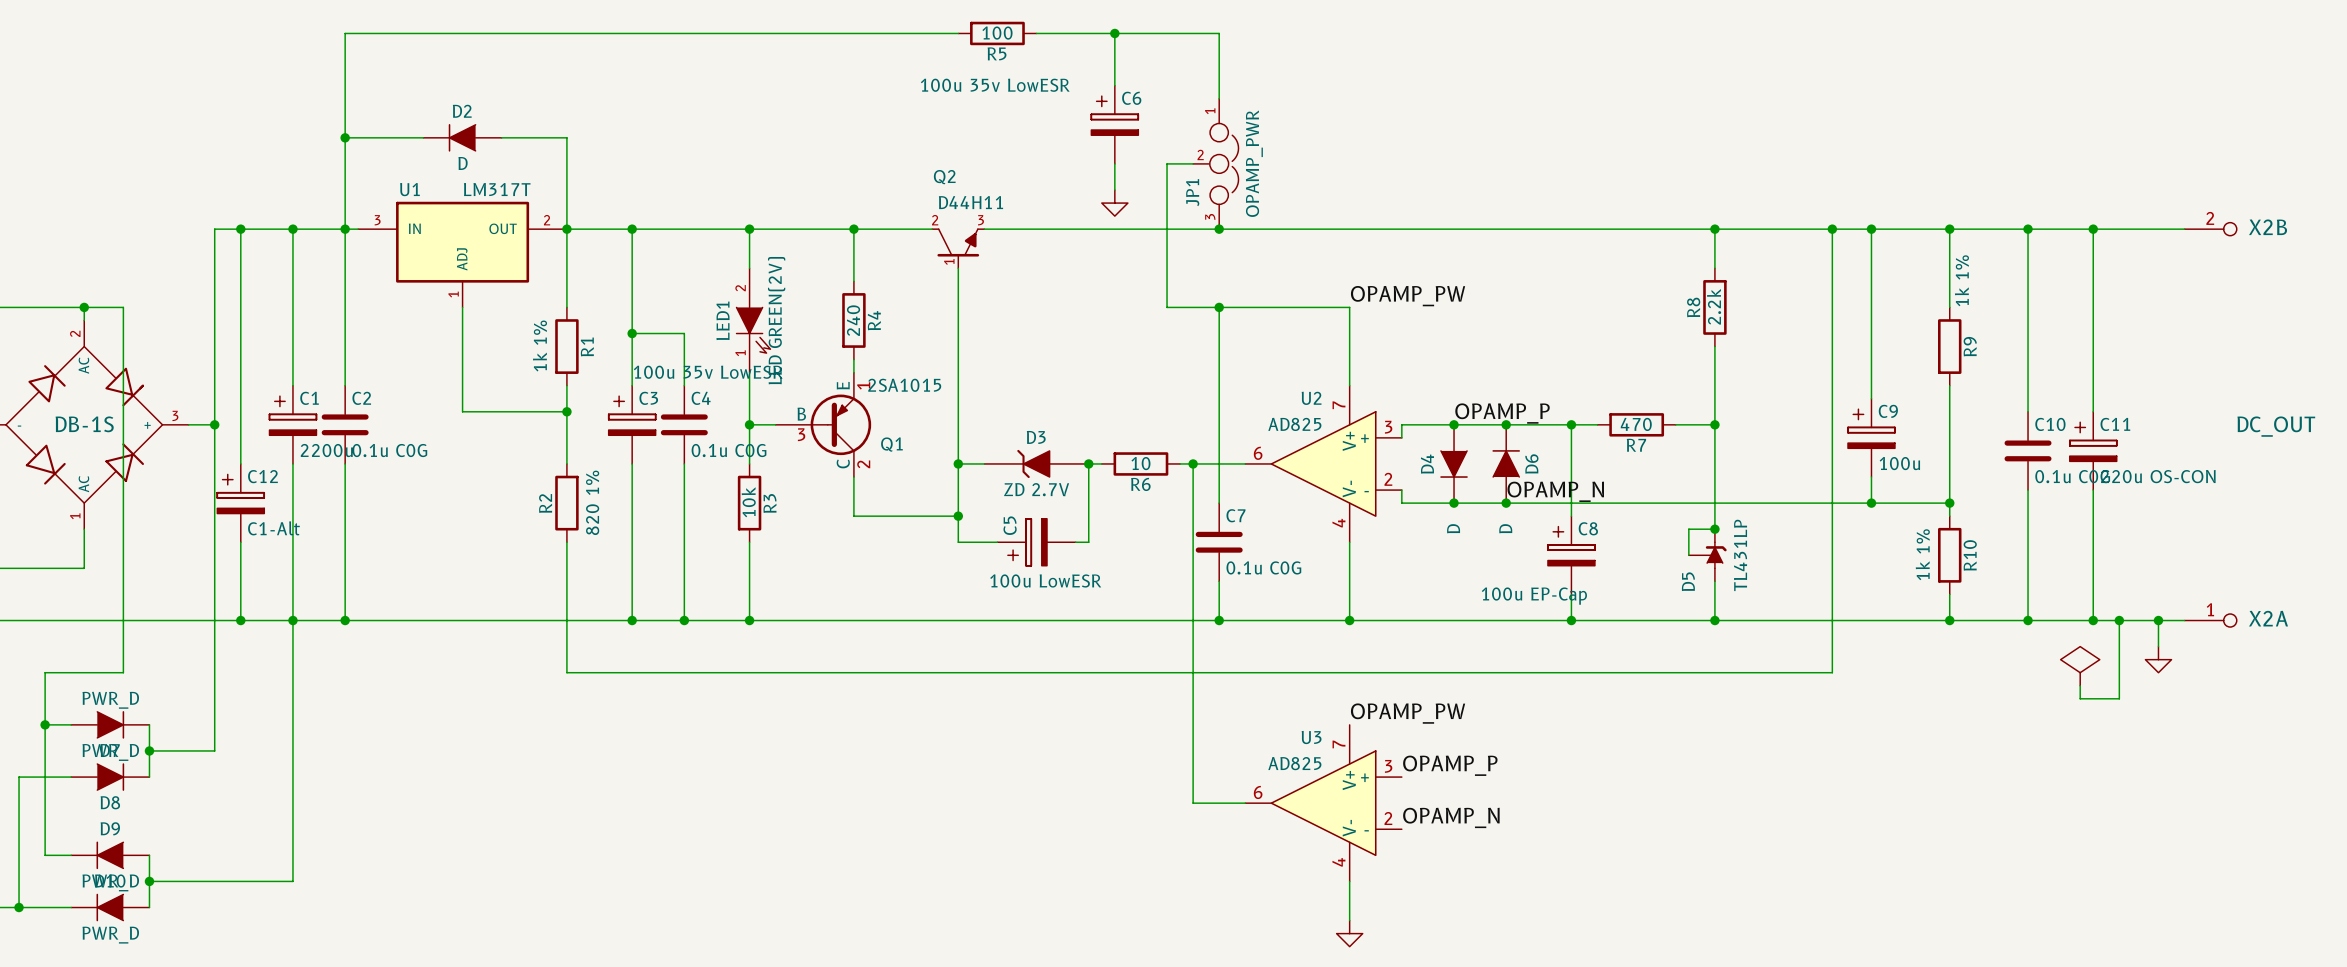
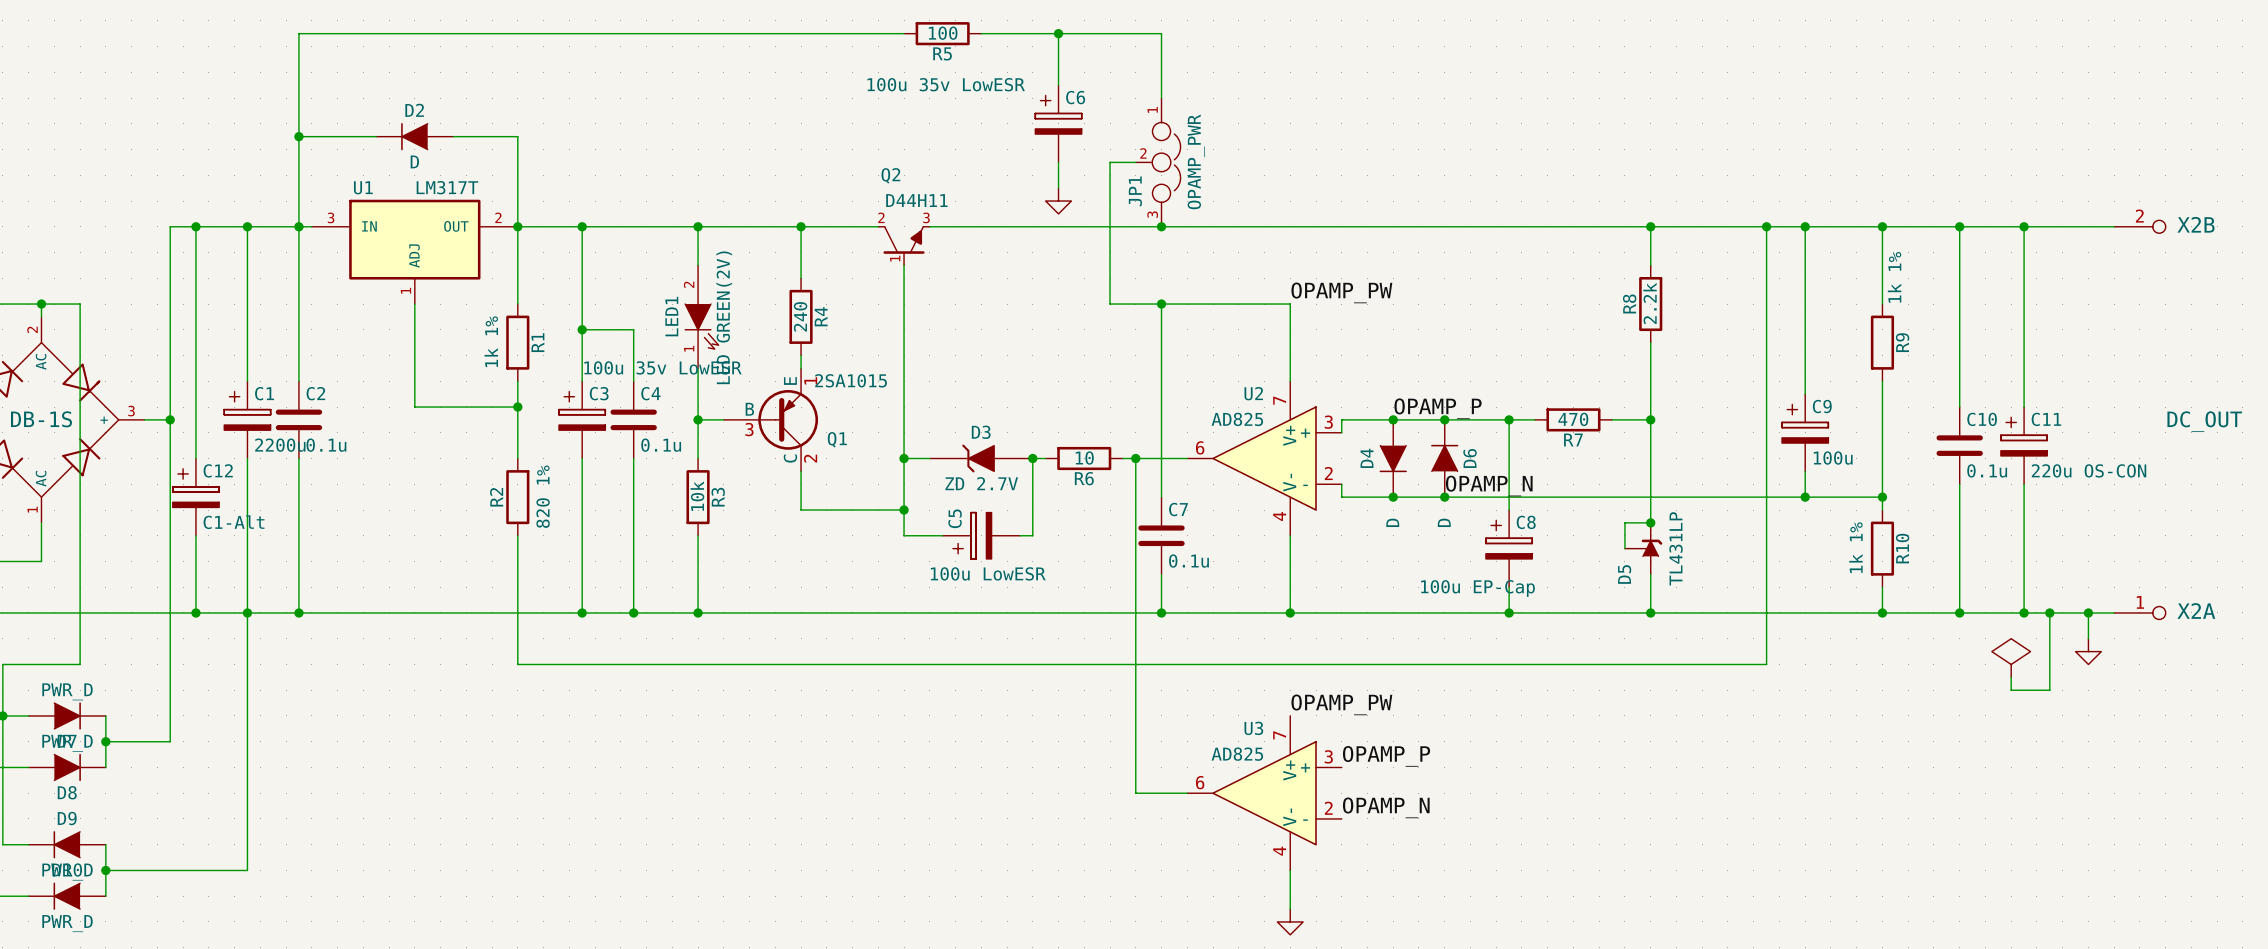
C2 value: 0.1u C0G (389, 450) -> 0.1u (326, 445)
C4 value: 0.1u C0G (729, 450) -> 0.1u (661, 445)
C10 value: 0.1u C0G (2072, 476) -> 0.1u (1987, 470)
C7 value: 0.1u C0G (1263, 567) -> 0.1u (1189, 561)

